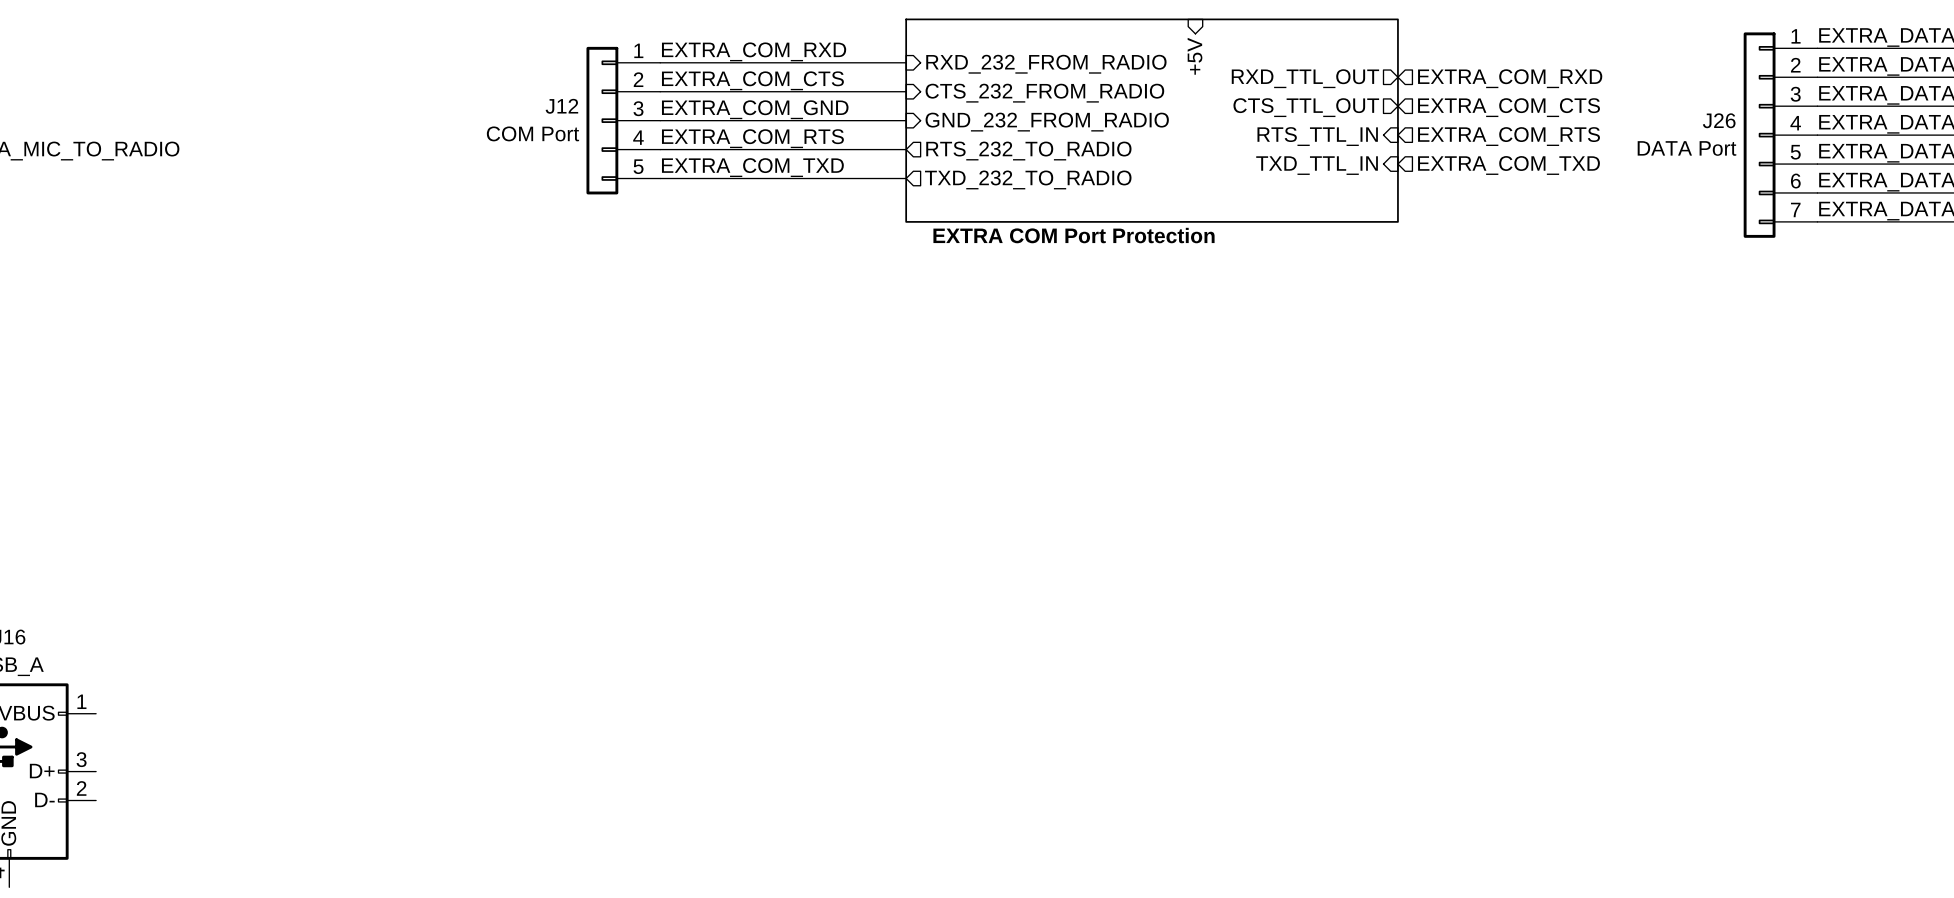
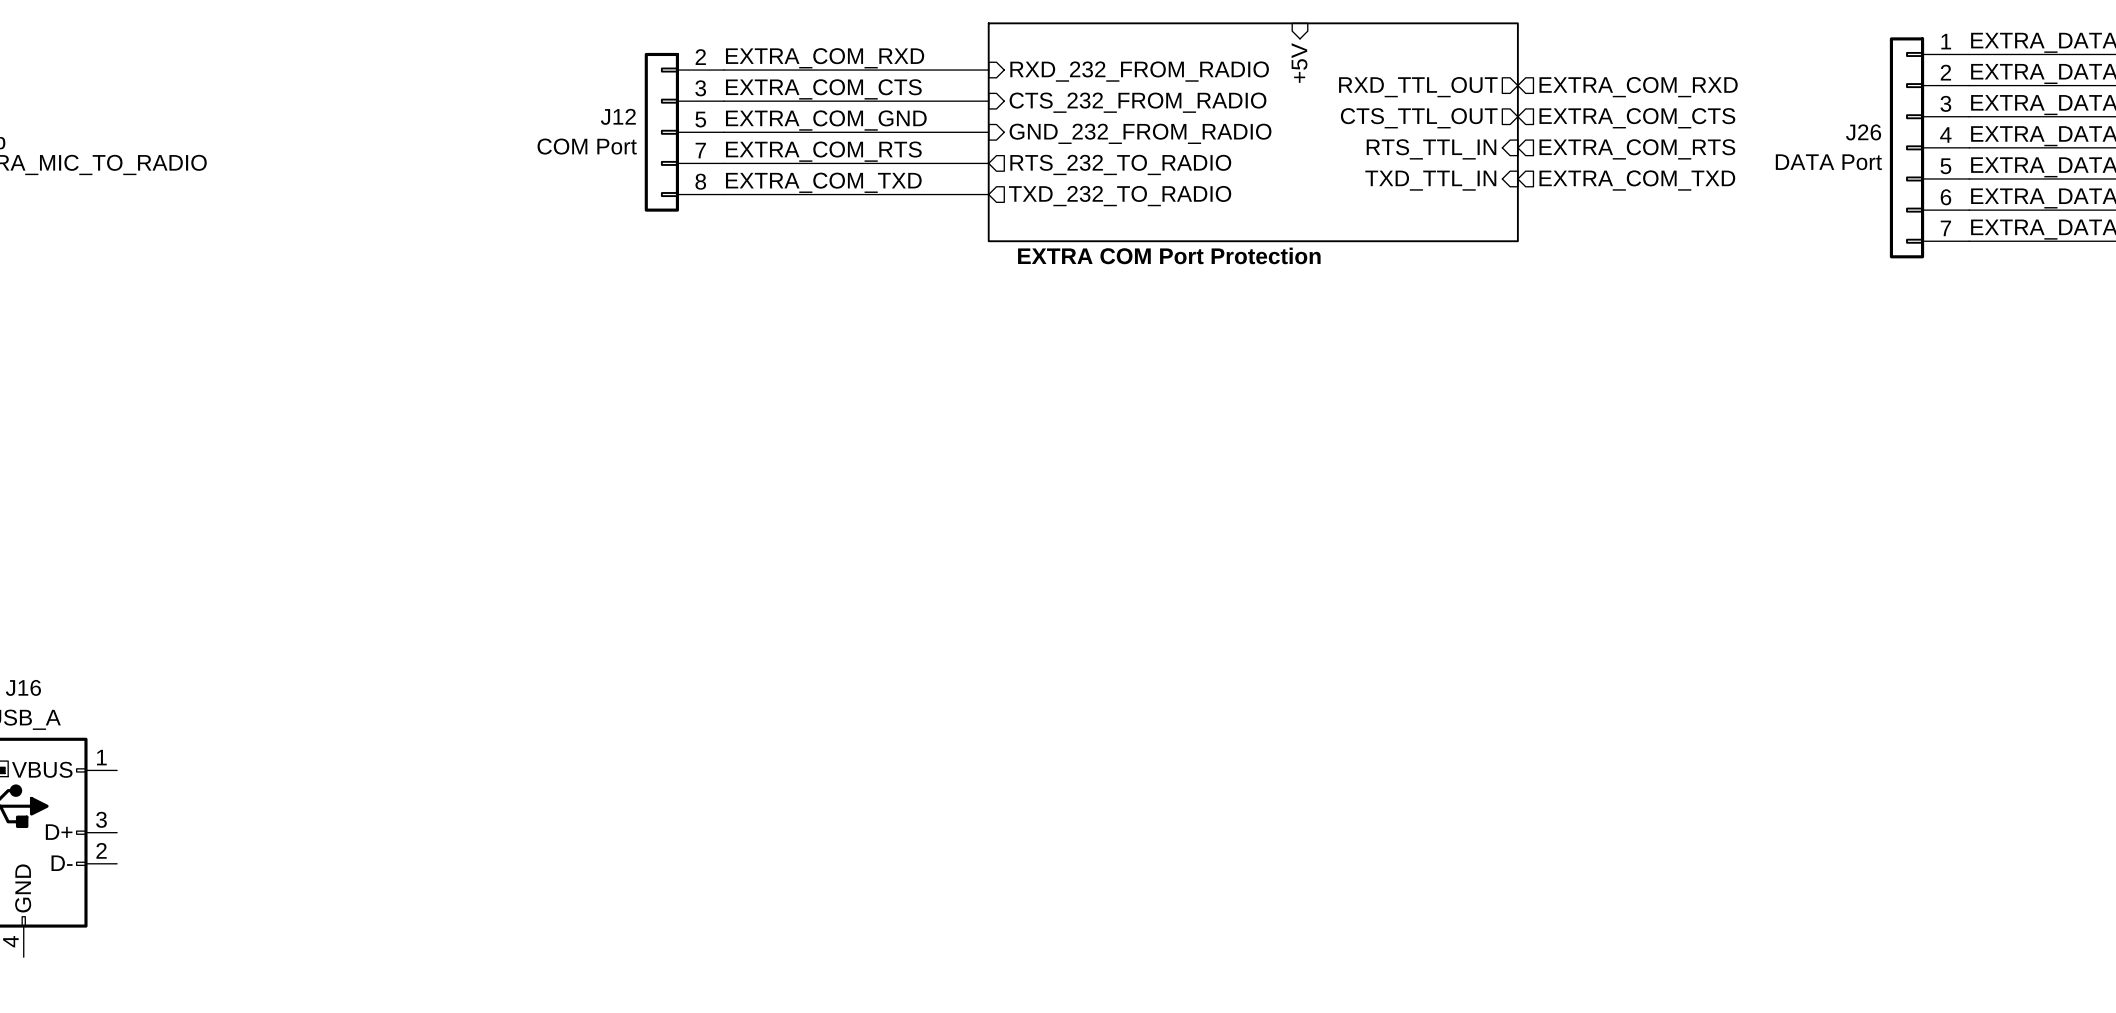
J12 pin number: 1 (638, 50) -> 2 (700, 57)
J12 pin number: 2 (638, 79) -> 3 (700, 88)
J12 pin number: 3 (638, 108) -> 5 (700, 119)
J12 pin number: 4 (638, 137) -> 7 (700, 150)
J12 pin number: 5 (638, 166) -> 8 (700, 181)

